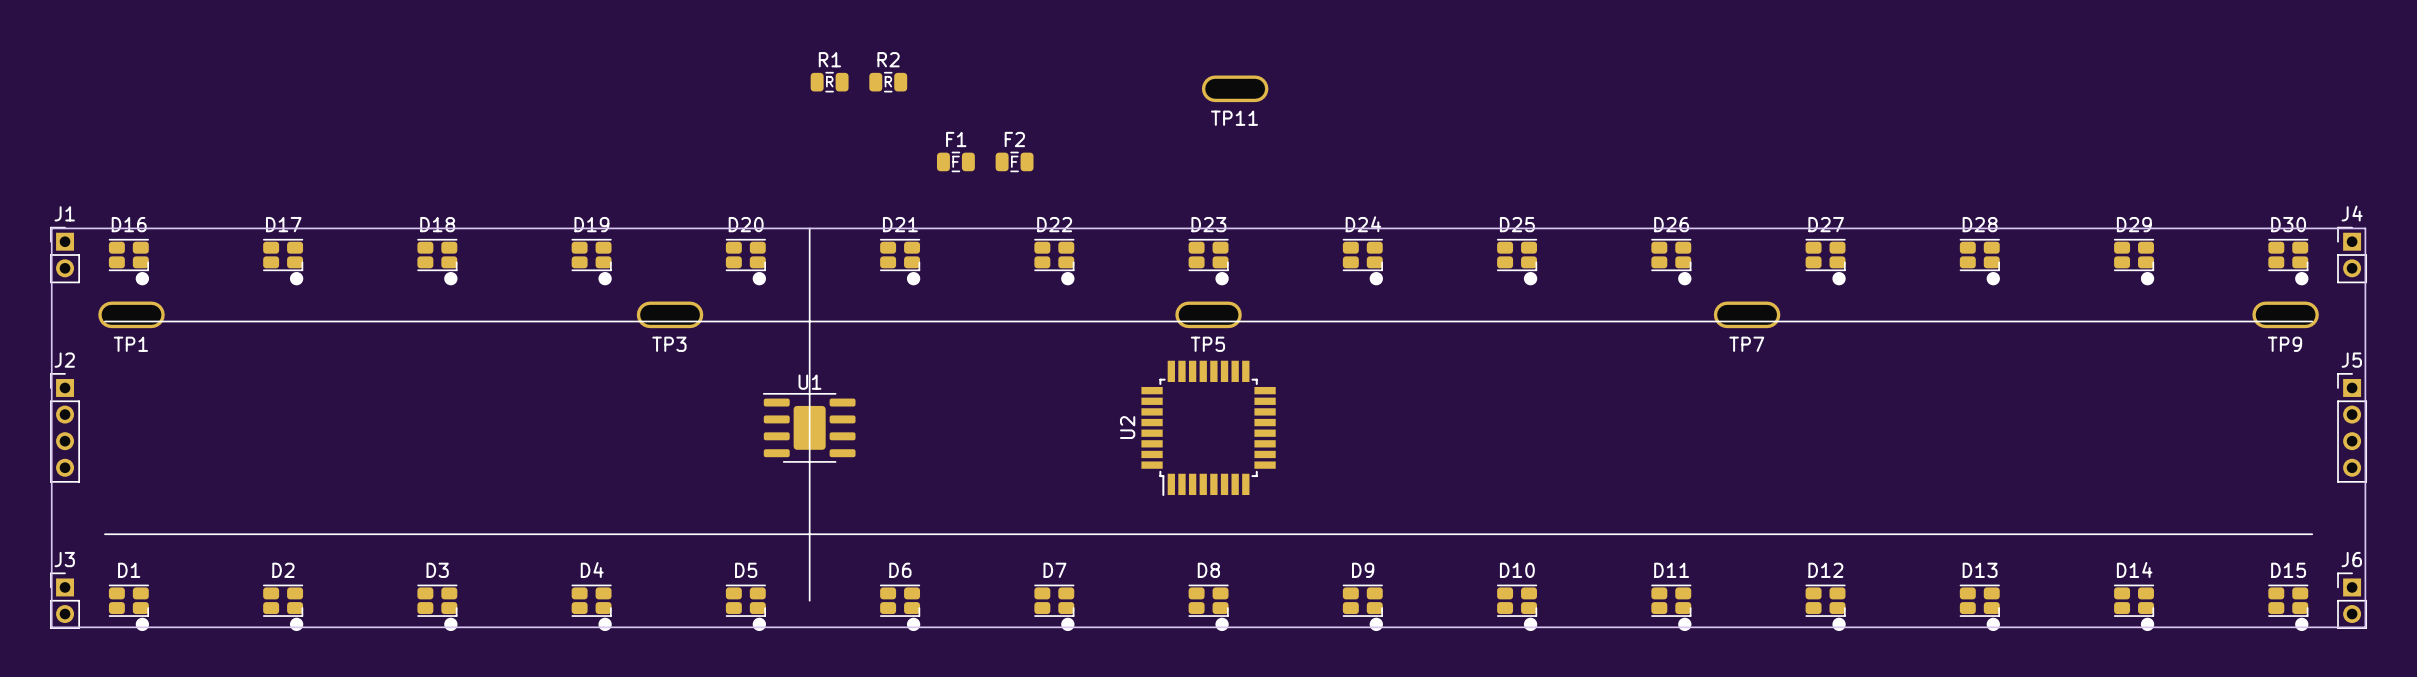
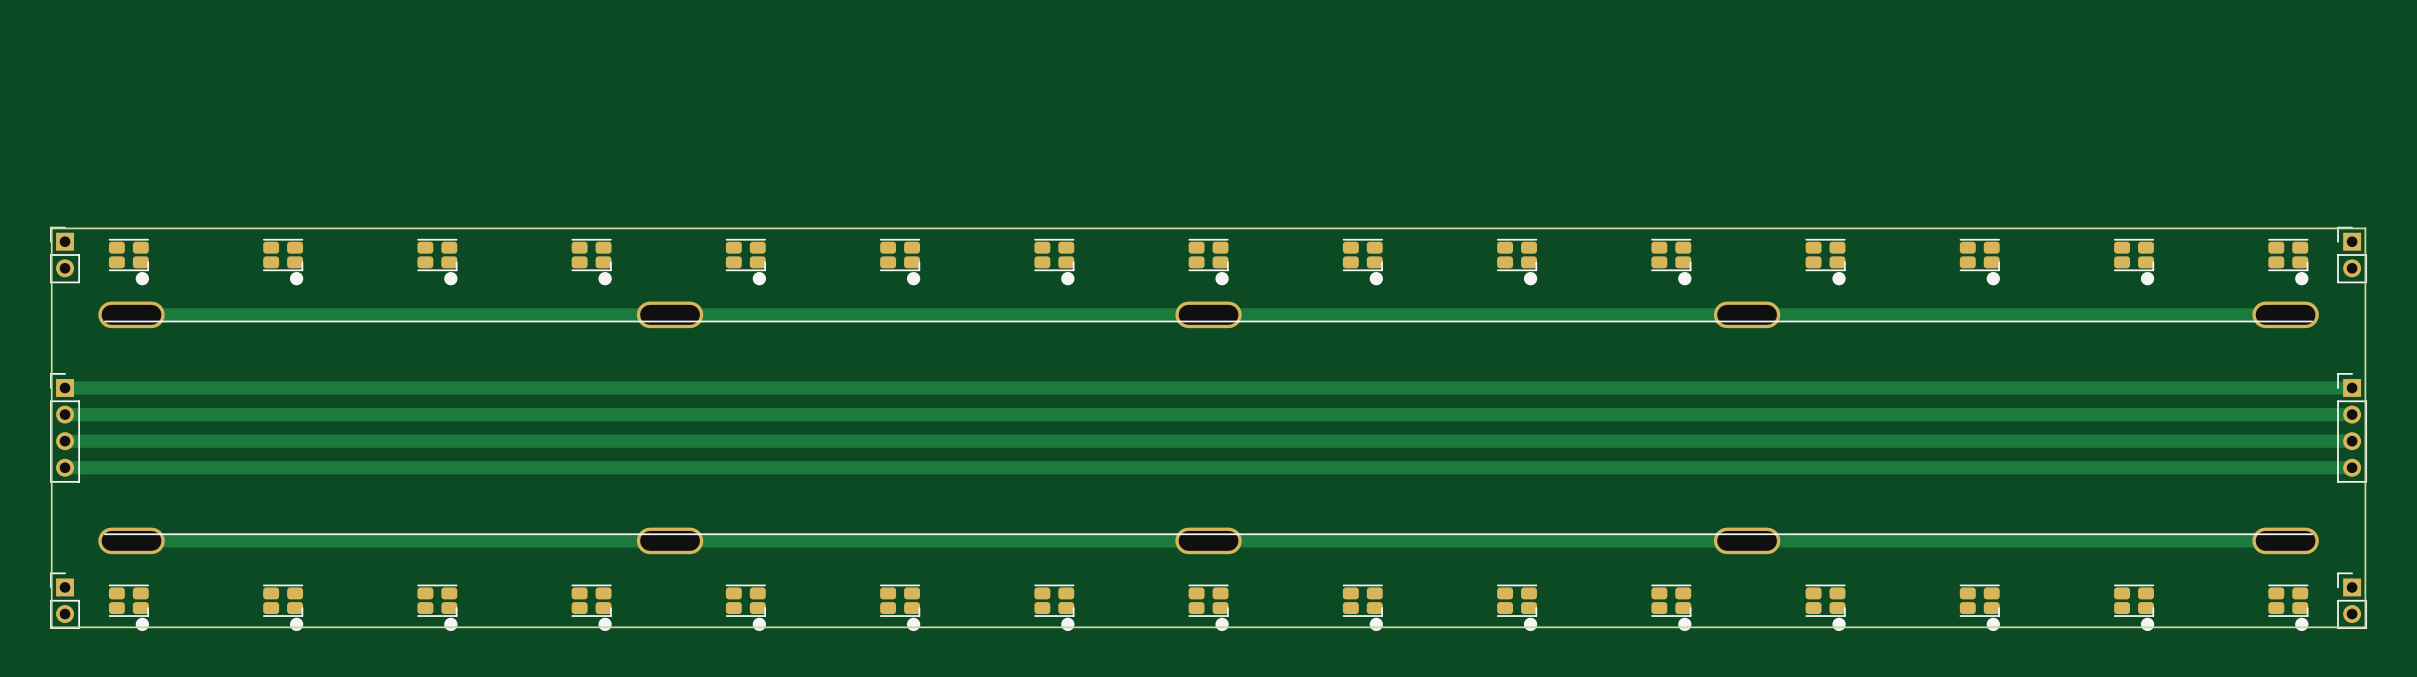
R1: (829, 82) -> none
R2: (888, 82) -> none
TP11: (1235, 88) -> none
F1: (955, 161) -> none
F2: (1014, 161) -> none
J1 name: J1 (64, 213) -> none
J4 name: J4 (2352, 213) -> none
D16 name: D16 (129, 224) -> none
D17 name: D17 (283, 224) -> none
D18 name: D18 (437, 224) -> none
D19 name: D19 (591, 224) -> none
D20 name: D20 (746, 224) -> none
D21 name: D21 (900, 224) -> none
D22 name: D22 (1054, 224) -> none
D23 name: D23 (1208, 224) -> none
D24 name: D24 (1363, 224) -> none
D25 name: D25 (1517, 224) -> none
D26 name: D26 (1671, 224) -> none
D27 name: D27 (1826, 224) -> none
D28 name: D28 (1980, 224) -> none
D29 name: D29 (2134, 224) -> none
D30 name: D30 (2288, 224) -> none
line: (809, 228) (809, 600) -> none
track: none -> (131, 314) (2285, 314)
TP1 name: TP1 (130, 344) -> none
TP3 name: TP3 (669, 344) -> none
TP5 name: TP5 (1207, 344) -> none
TP7 name: TP7 (1746, 344) -> none
TP9 name: TP9 (2284, 344) -> none
J2 name: J2 (64, 360) -> none
J5 name: J5 (2351, 360) -> none
track: none -> (65, 387) (2352, 387)
track: none -> (65, 414) (2352, 414)
U1: (809, 427) -> none
U2: (1208, 428) -> none
track: none -> (65, 441) (2352, 441)
track: none -> (65, 467) (2352, 467)
track: none -> (131, 540) (2285, 540)
part: none -> (131, 540)
part: none -> (670, 540)
part: none -> (1208, 540)
part: none -> (1747, 540)
part: none -> (2285, 540)
J3 name: J3 (64, 559) -> none
J6 name: J6 (2351, 559) -> none
D1 name: D1 (129, 570) -> none
D2 name: D2 (283, 570) -> none
D3 name: D3 (437, 570) -> none
D4 name: D4 (592, 570) -> none
D5 name: D5 (746, 570) -> none
D6 name: D6 (900, 570) -> none
D7 name: D7 (1054, 570) -> none
D8 name: D8 (1208, 570) -> none
D9 name: D9 (1363, 570) -> none
D10 name: D10 (1517, 570) -> none
D11 name: D11 (1671, 570) -> none
D12 name: D12 (1825, 570) -> none
D13 name: D13 (1980, 570) -> none
D14 name: D14 (2134, 570) -> none
D15 name: D15 (2288, 570) -> none

